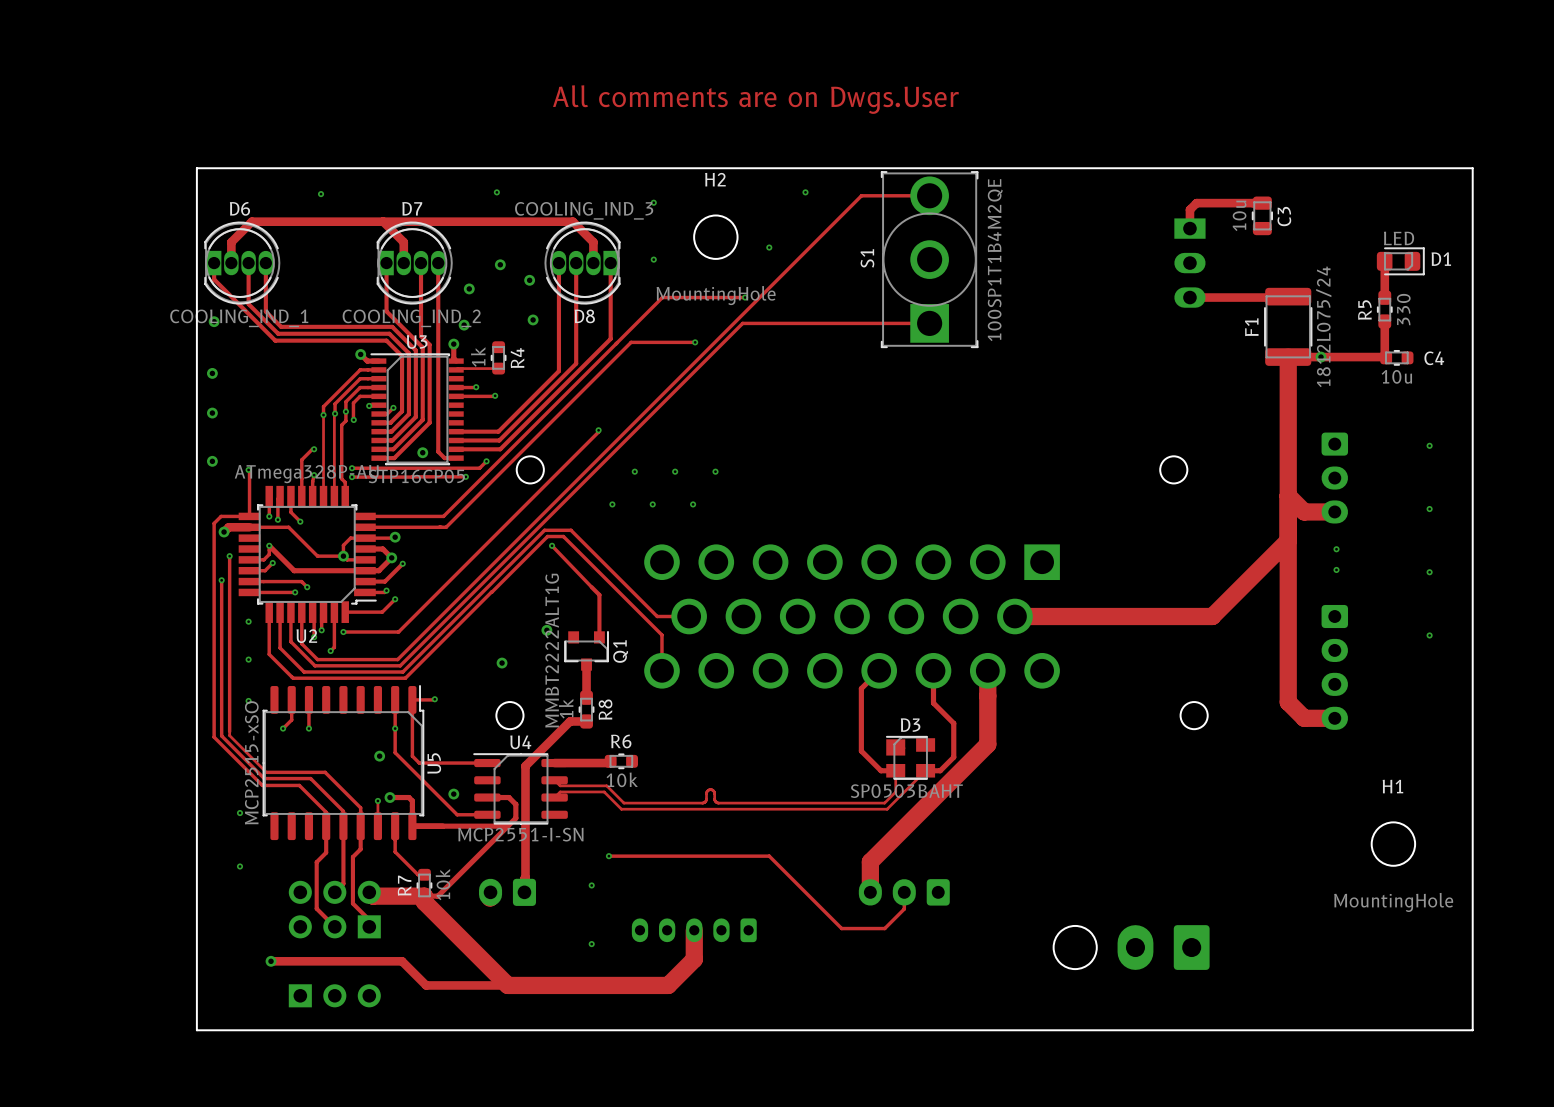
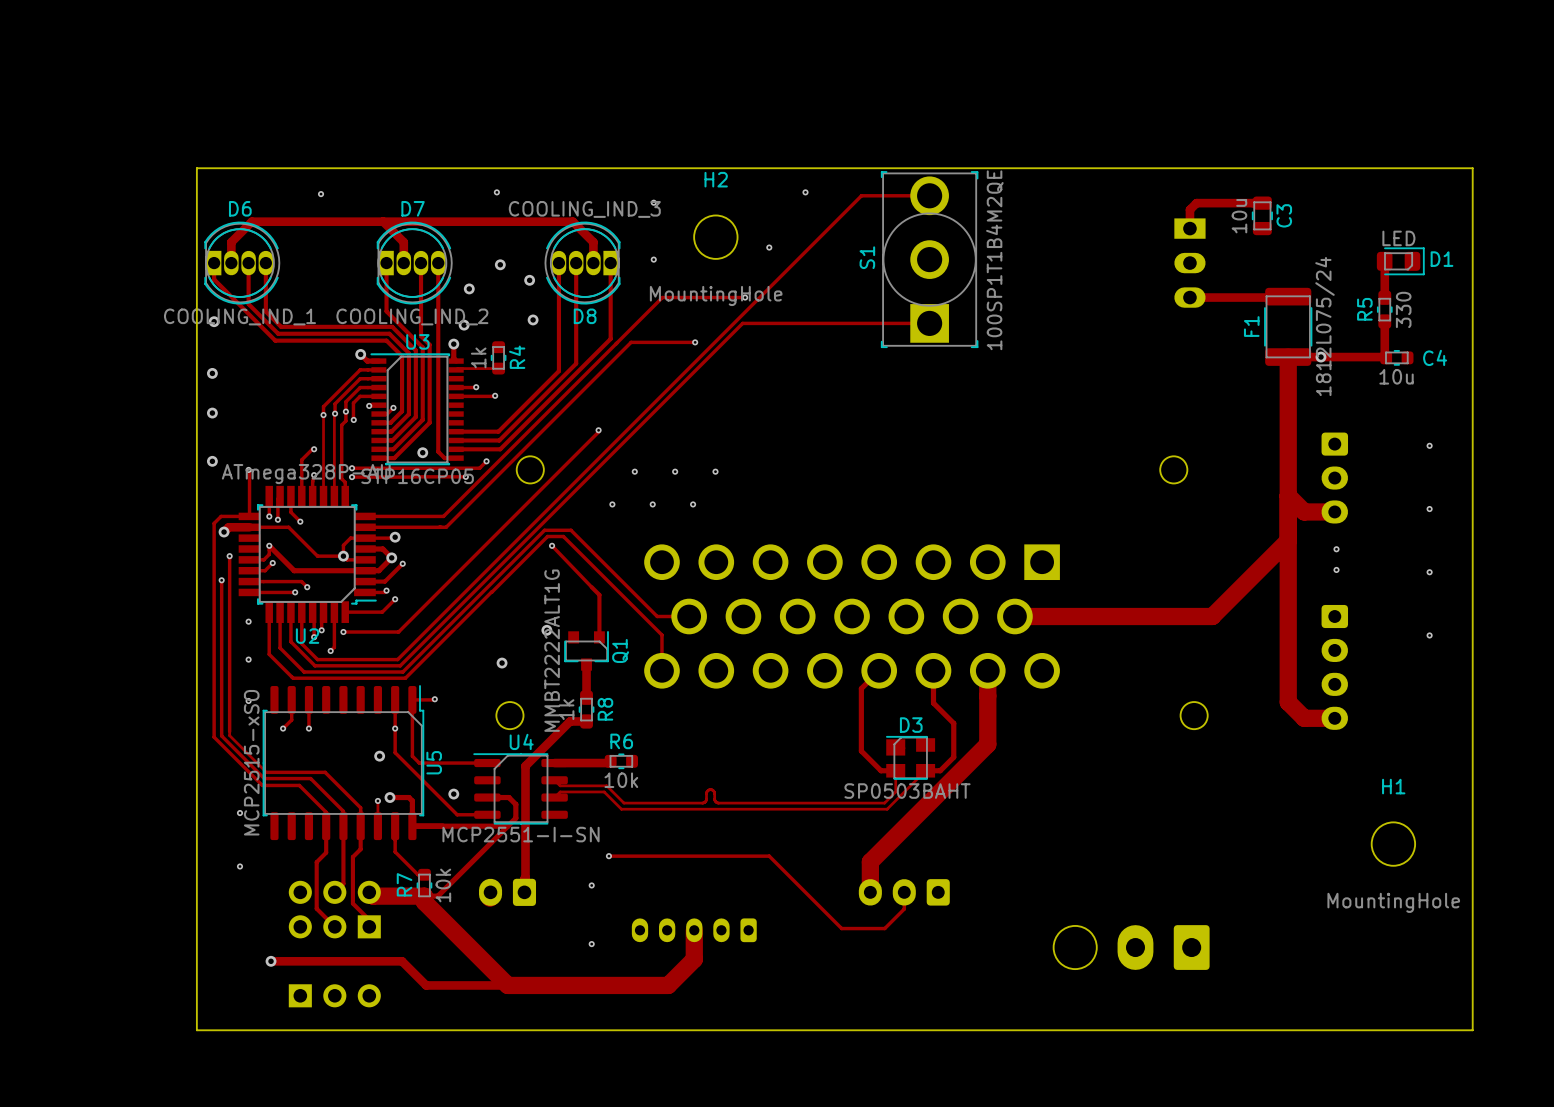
text: All comments are on Dwgs.User (755, 99) -> none

